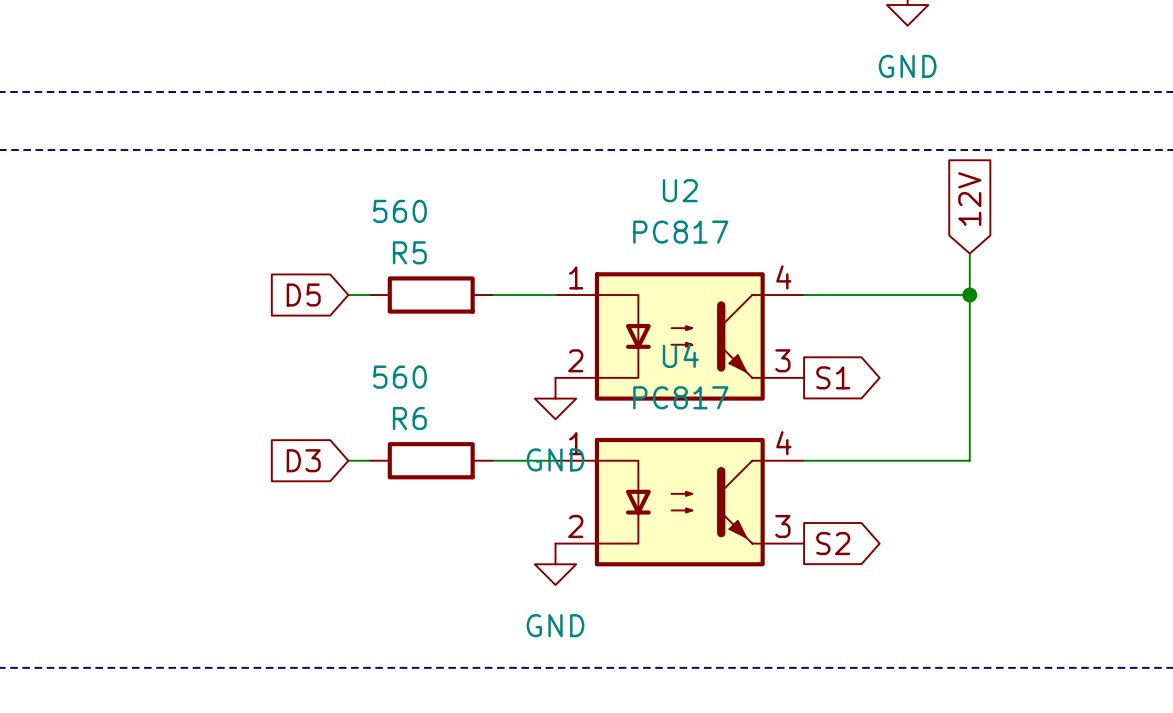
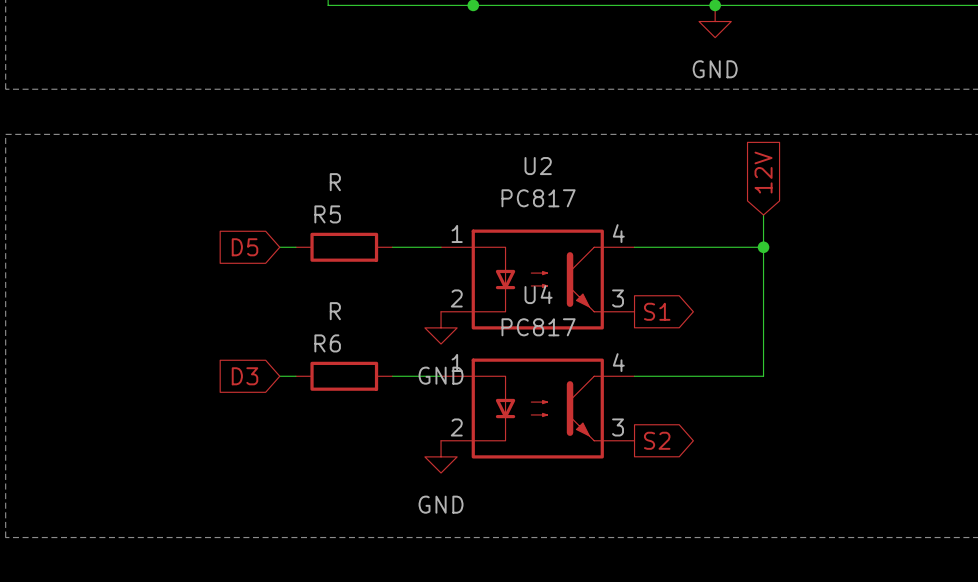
R5 value: 560 (400, 211) -> R (335, 182)
R6 value: 560 (400, 377) -> R (335, 311)

